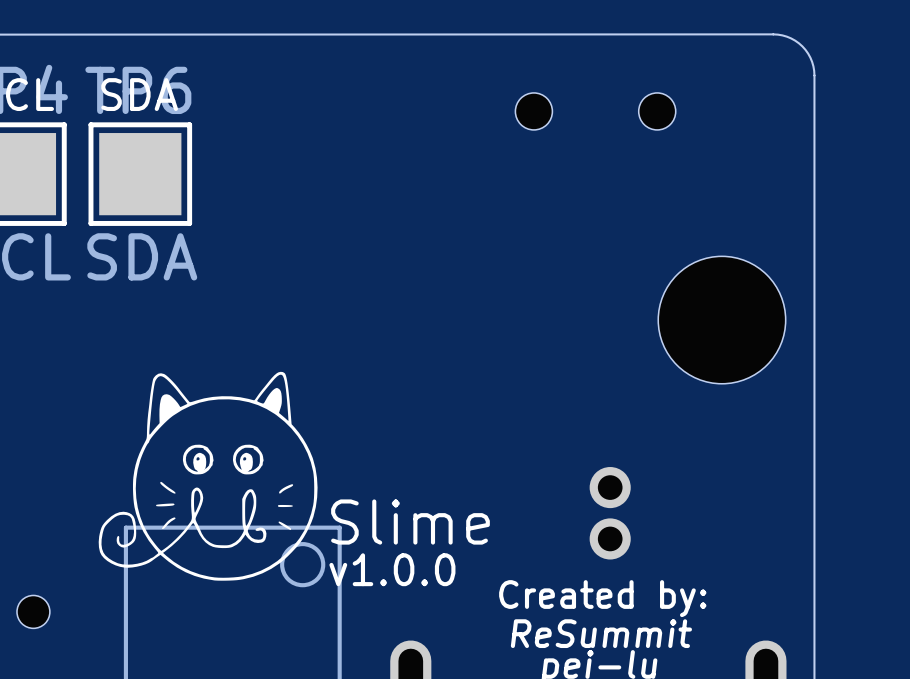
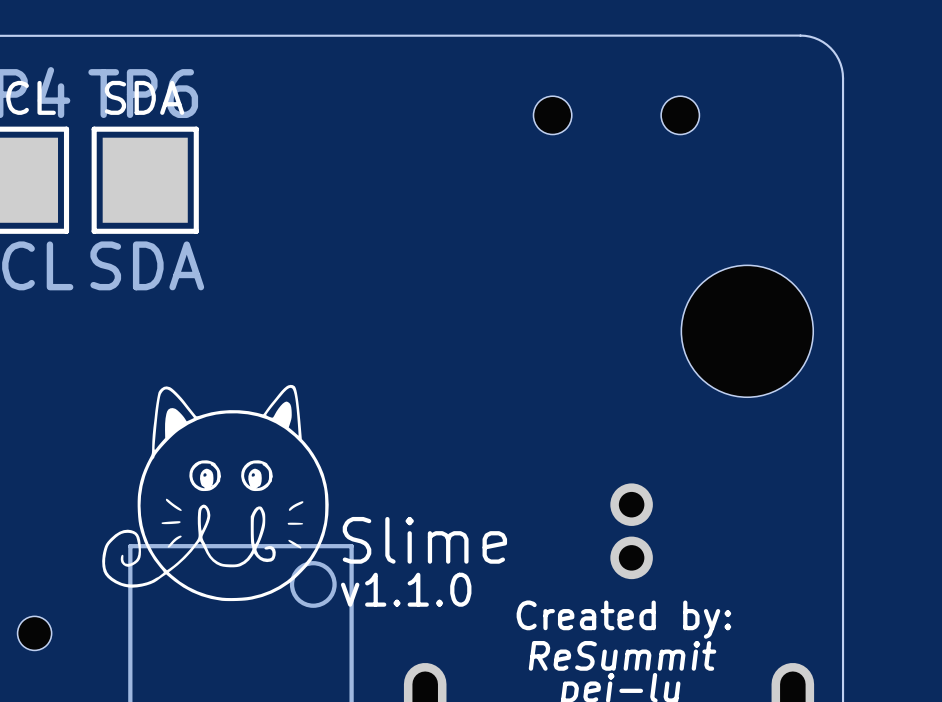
text: v1.0.0 (392, 569) -> v1.1.0 (406, 589)

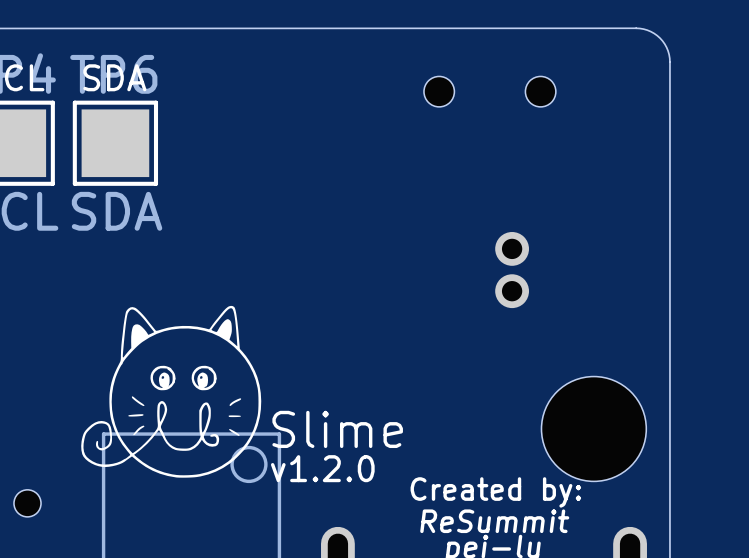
part position: (747, 331) -> (593, 428)
part position: (631, 531) -> (512, 270)
text: v1.1.0 (406, 589) -> v1.2.0 (322, 468)

